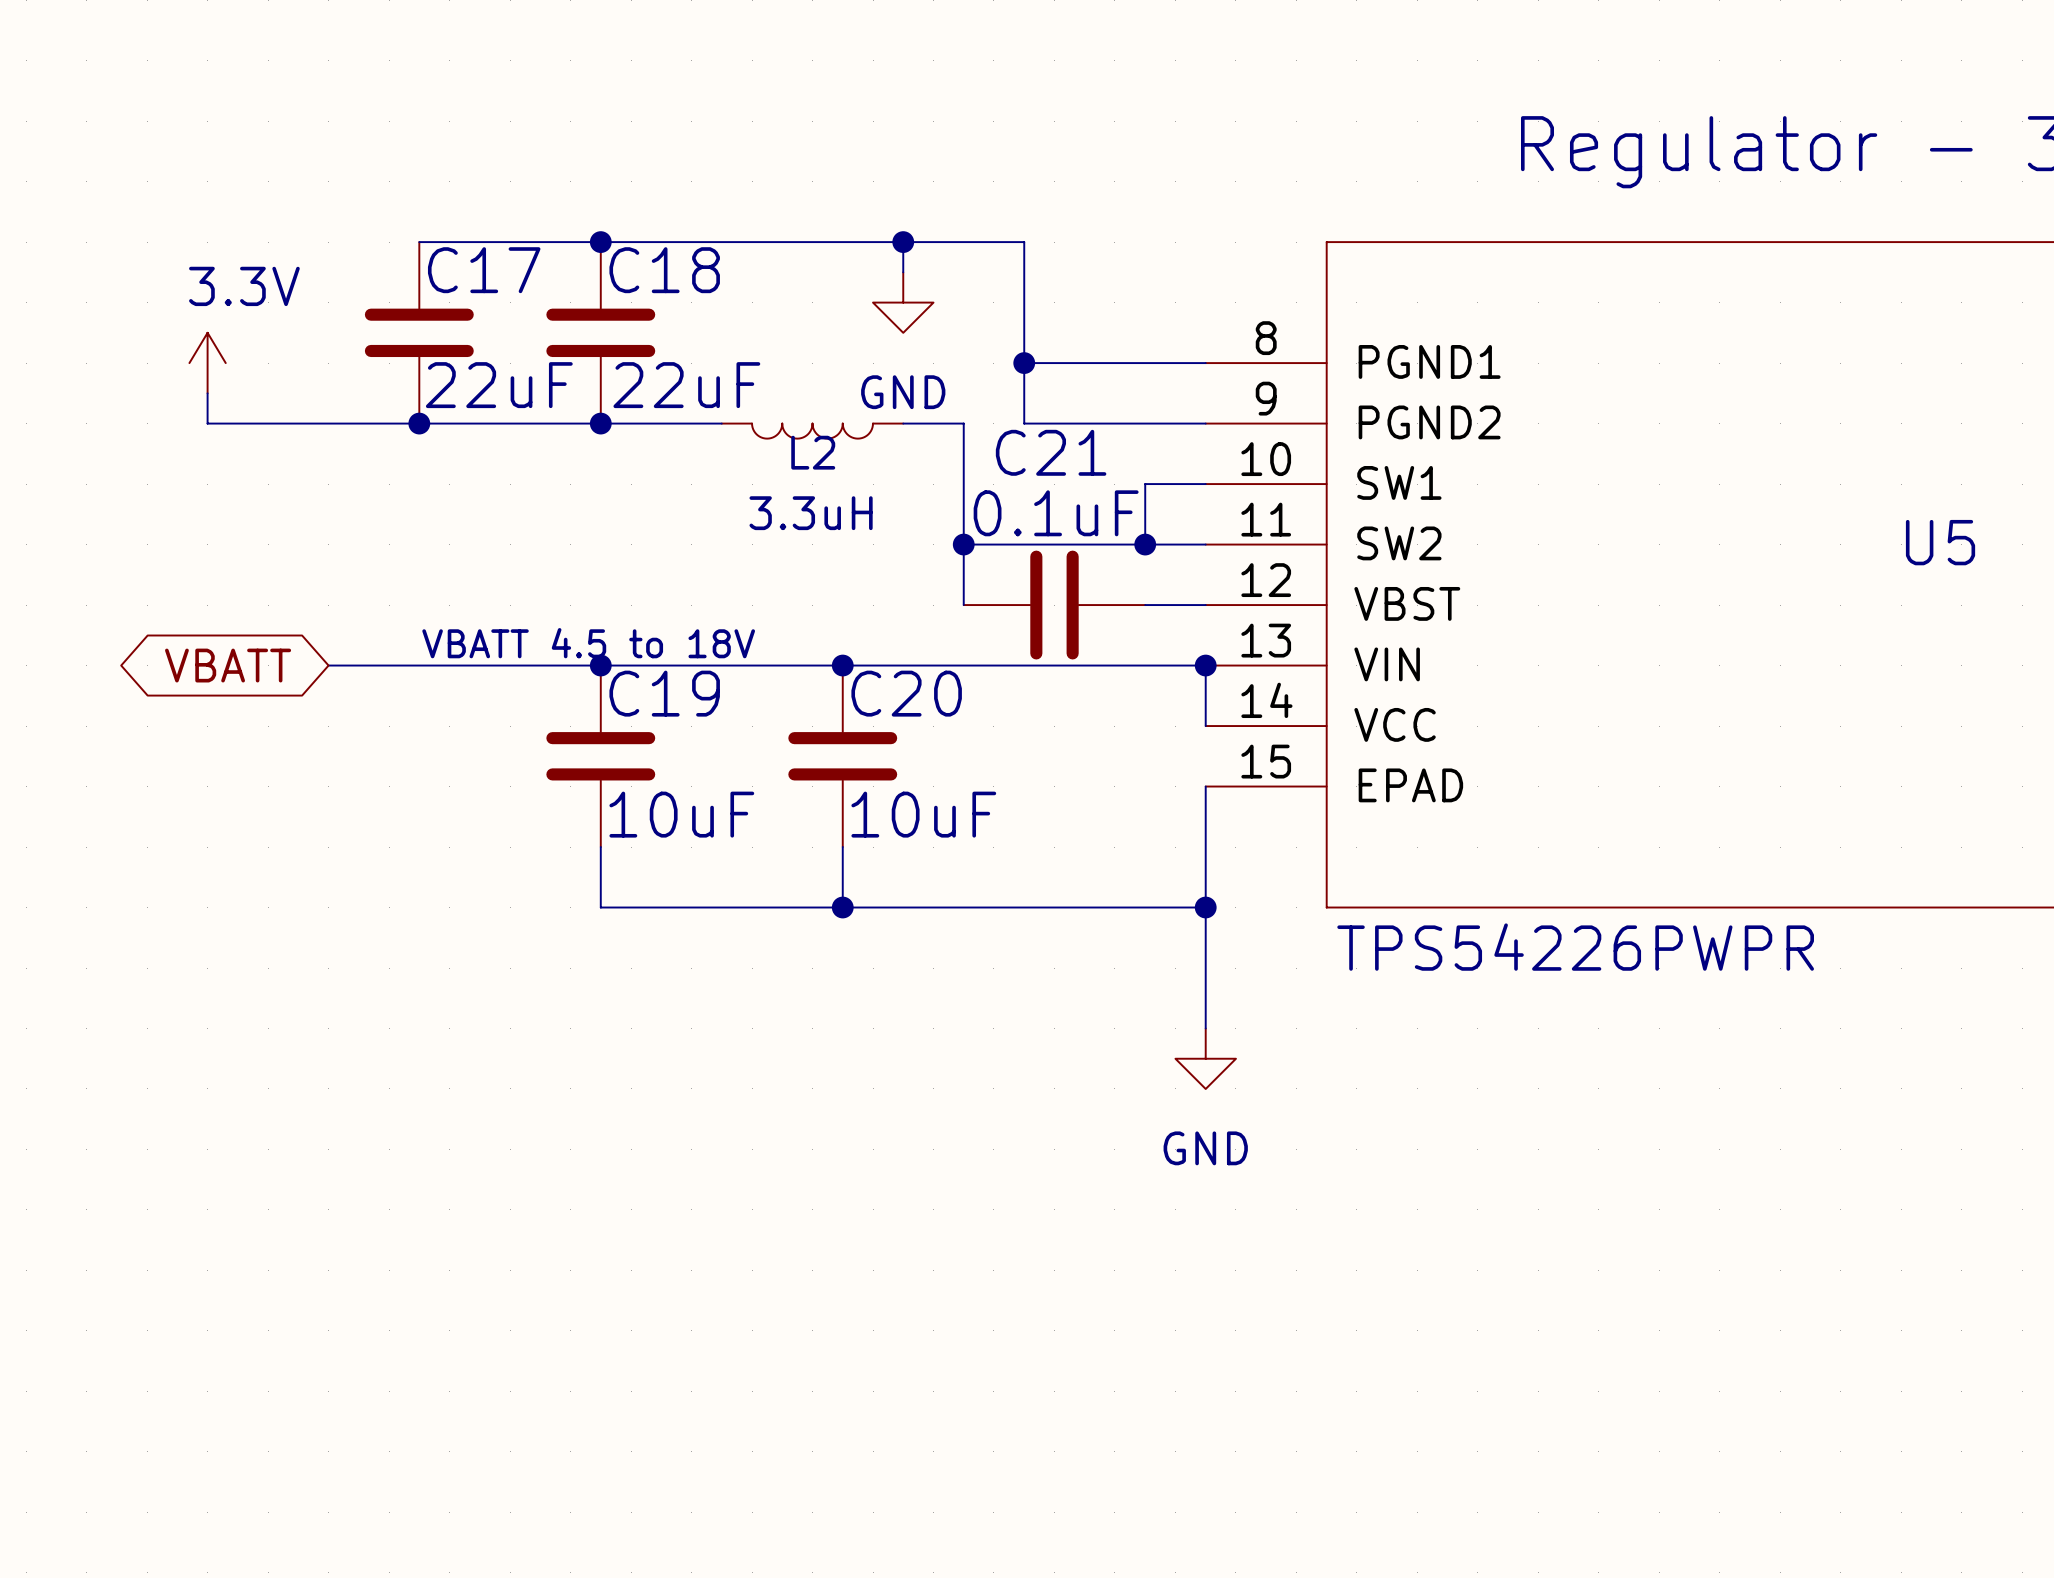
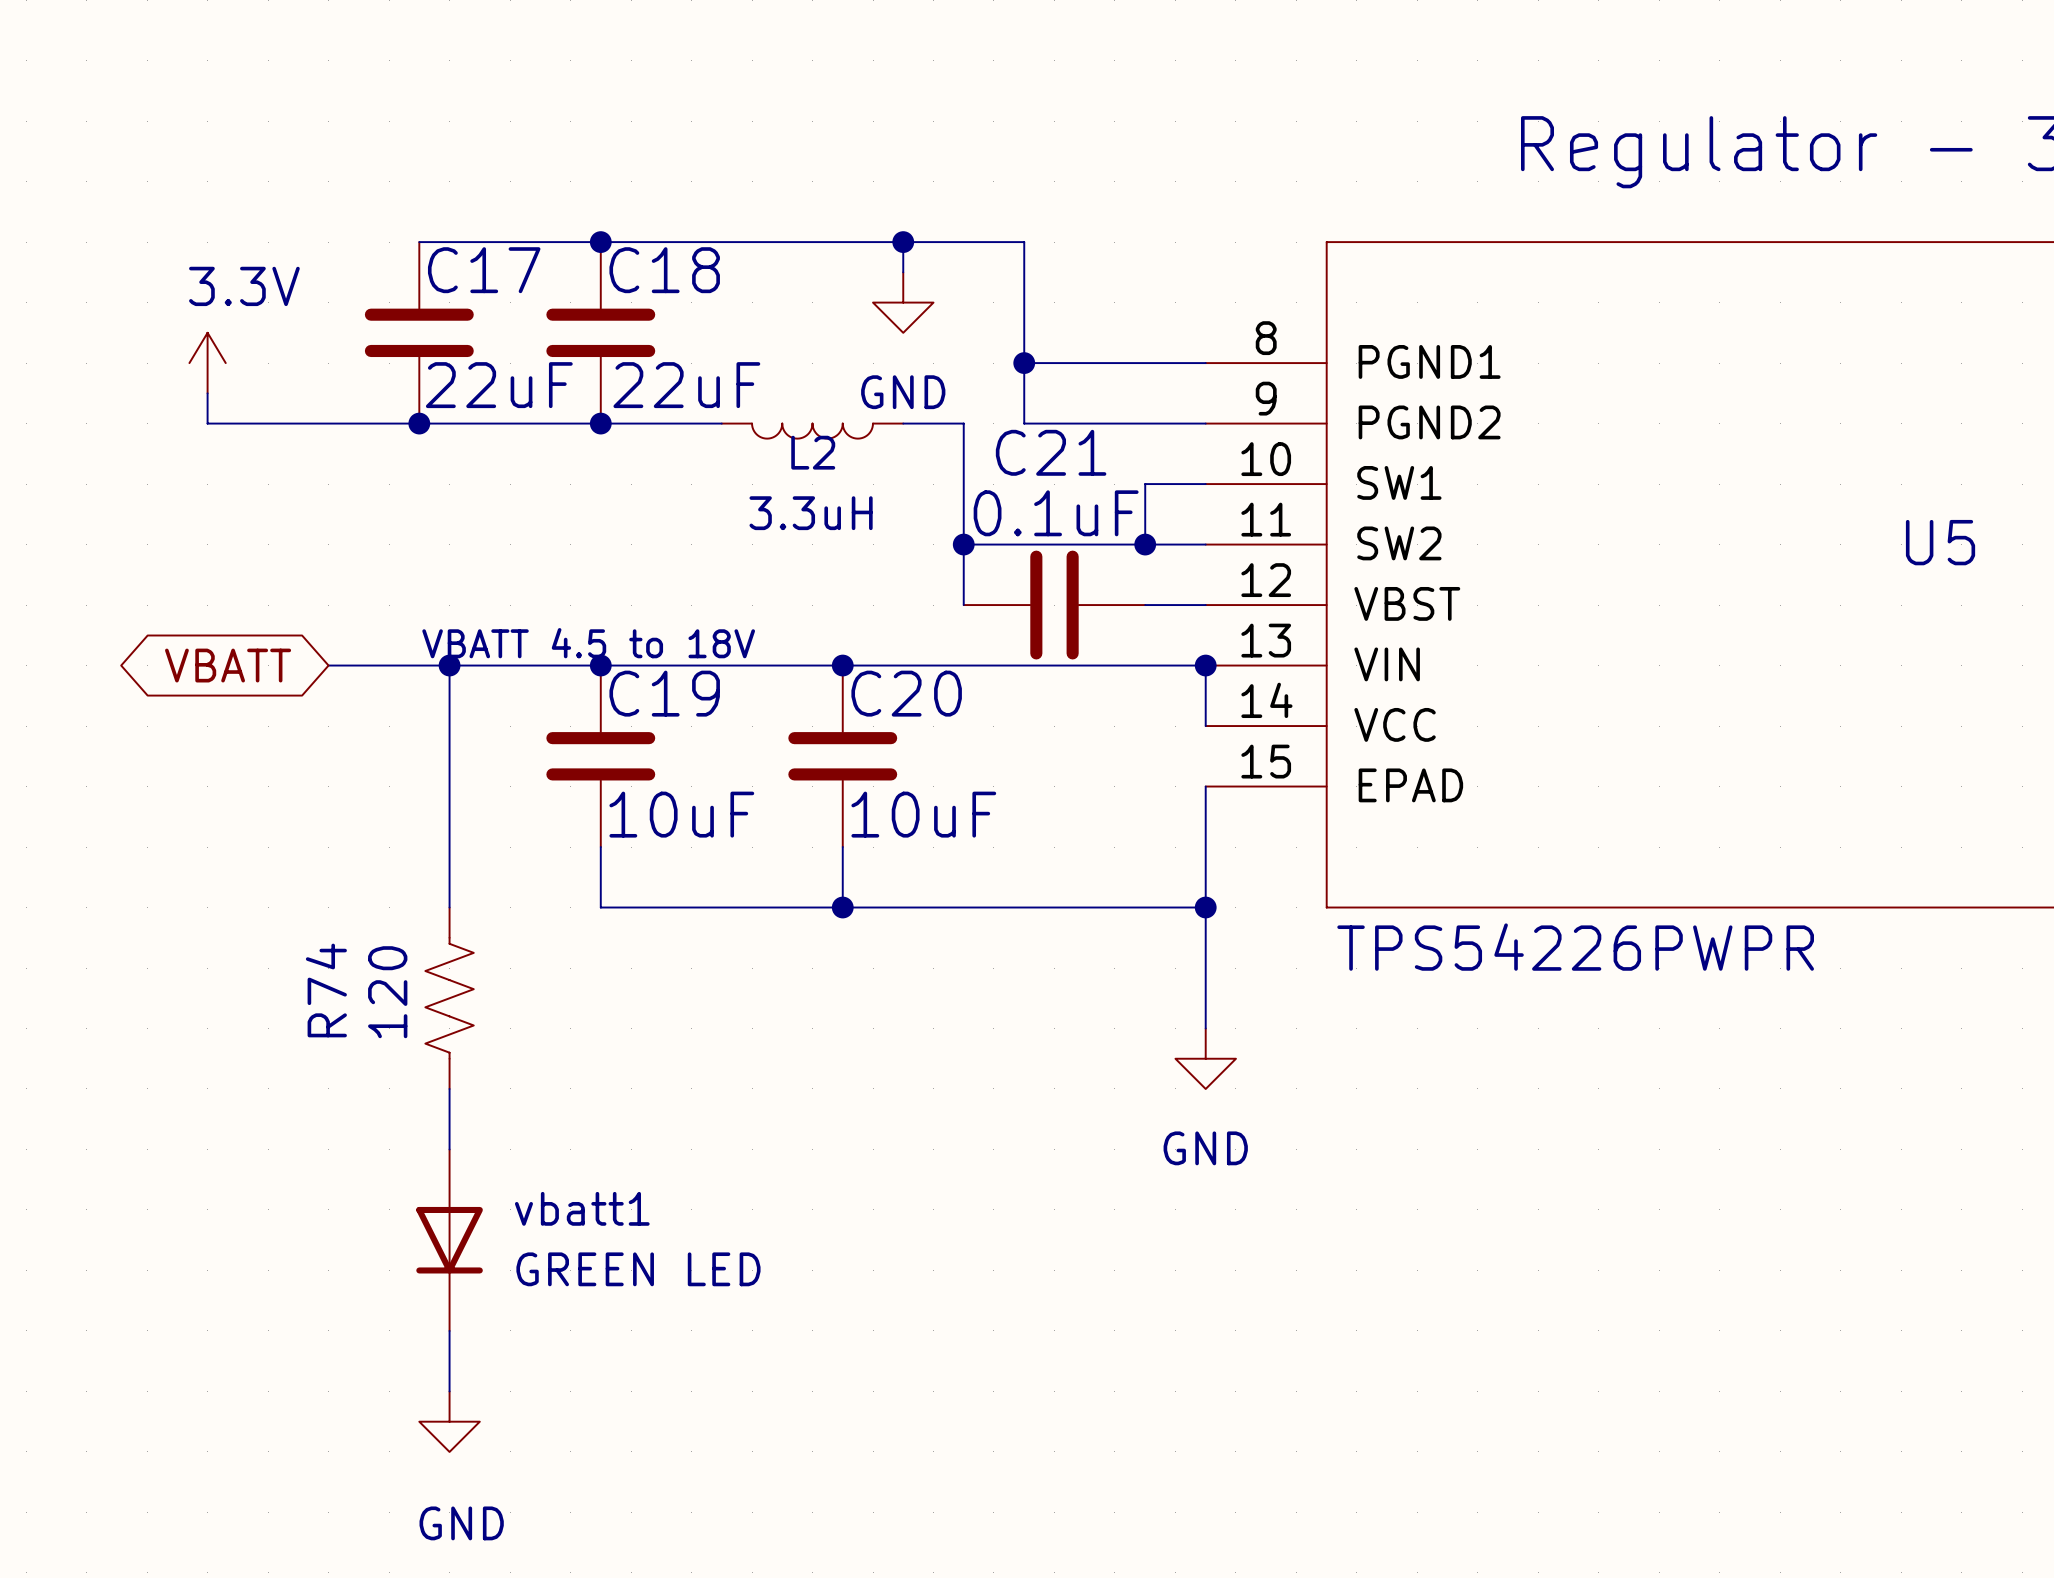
wire: none -> (449, 665) (449, 907)
junction: none -> (449, 665)
R74: none -> 120 (449, 998)
wire: none -> (449, 1088) (449, 1149)
vbatt1: none -> GREEN LED (449, 1240)
wire: none -> (449, 1330) (449, 1391)
power symbol: none -> GND (449, 1421)

